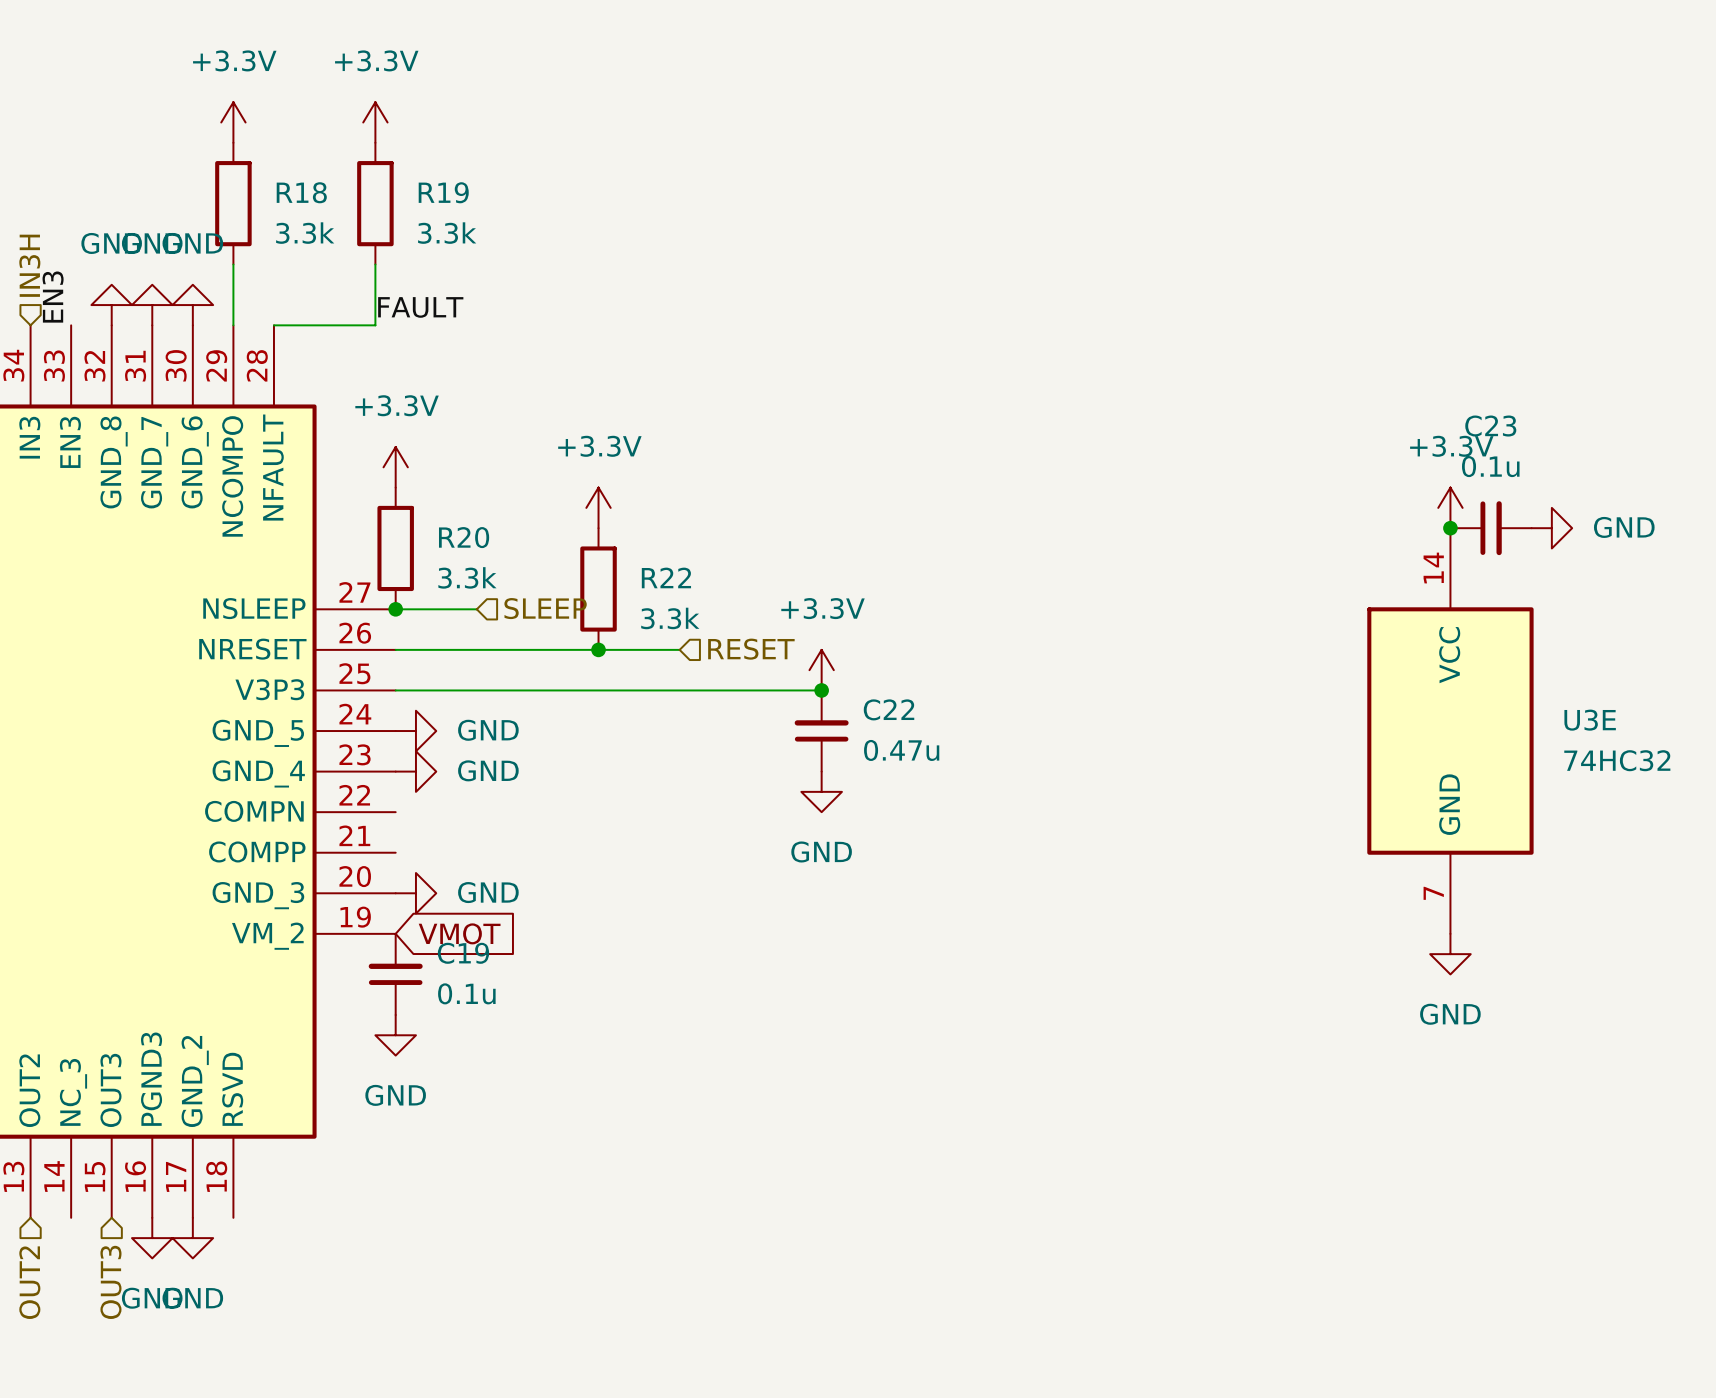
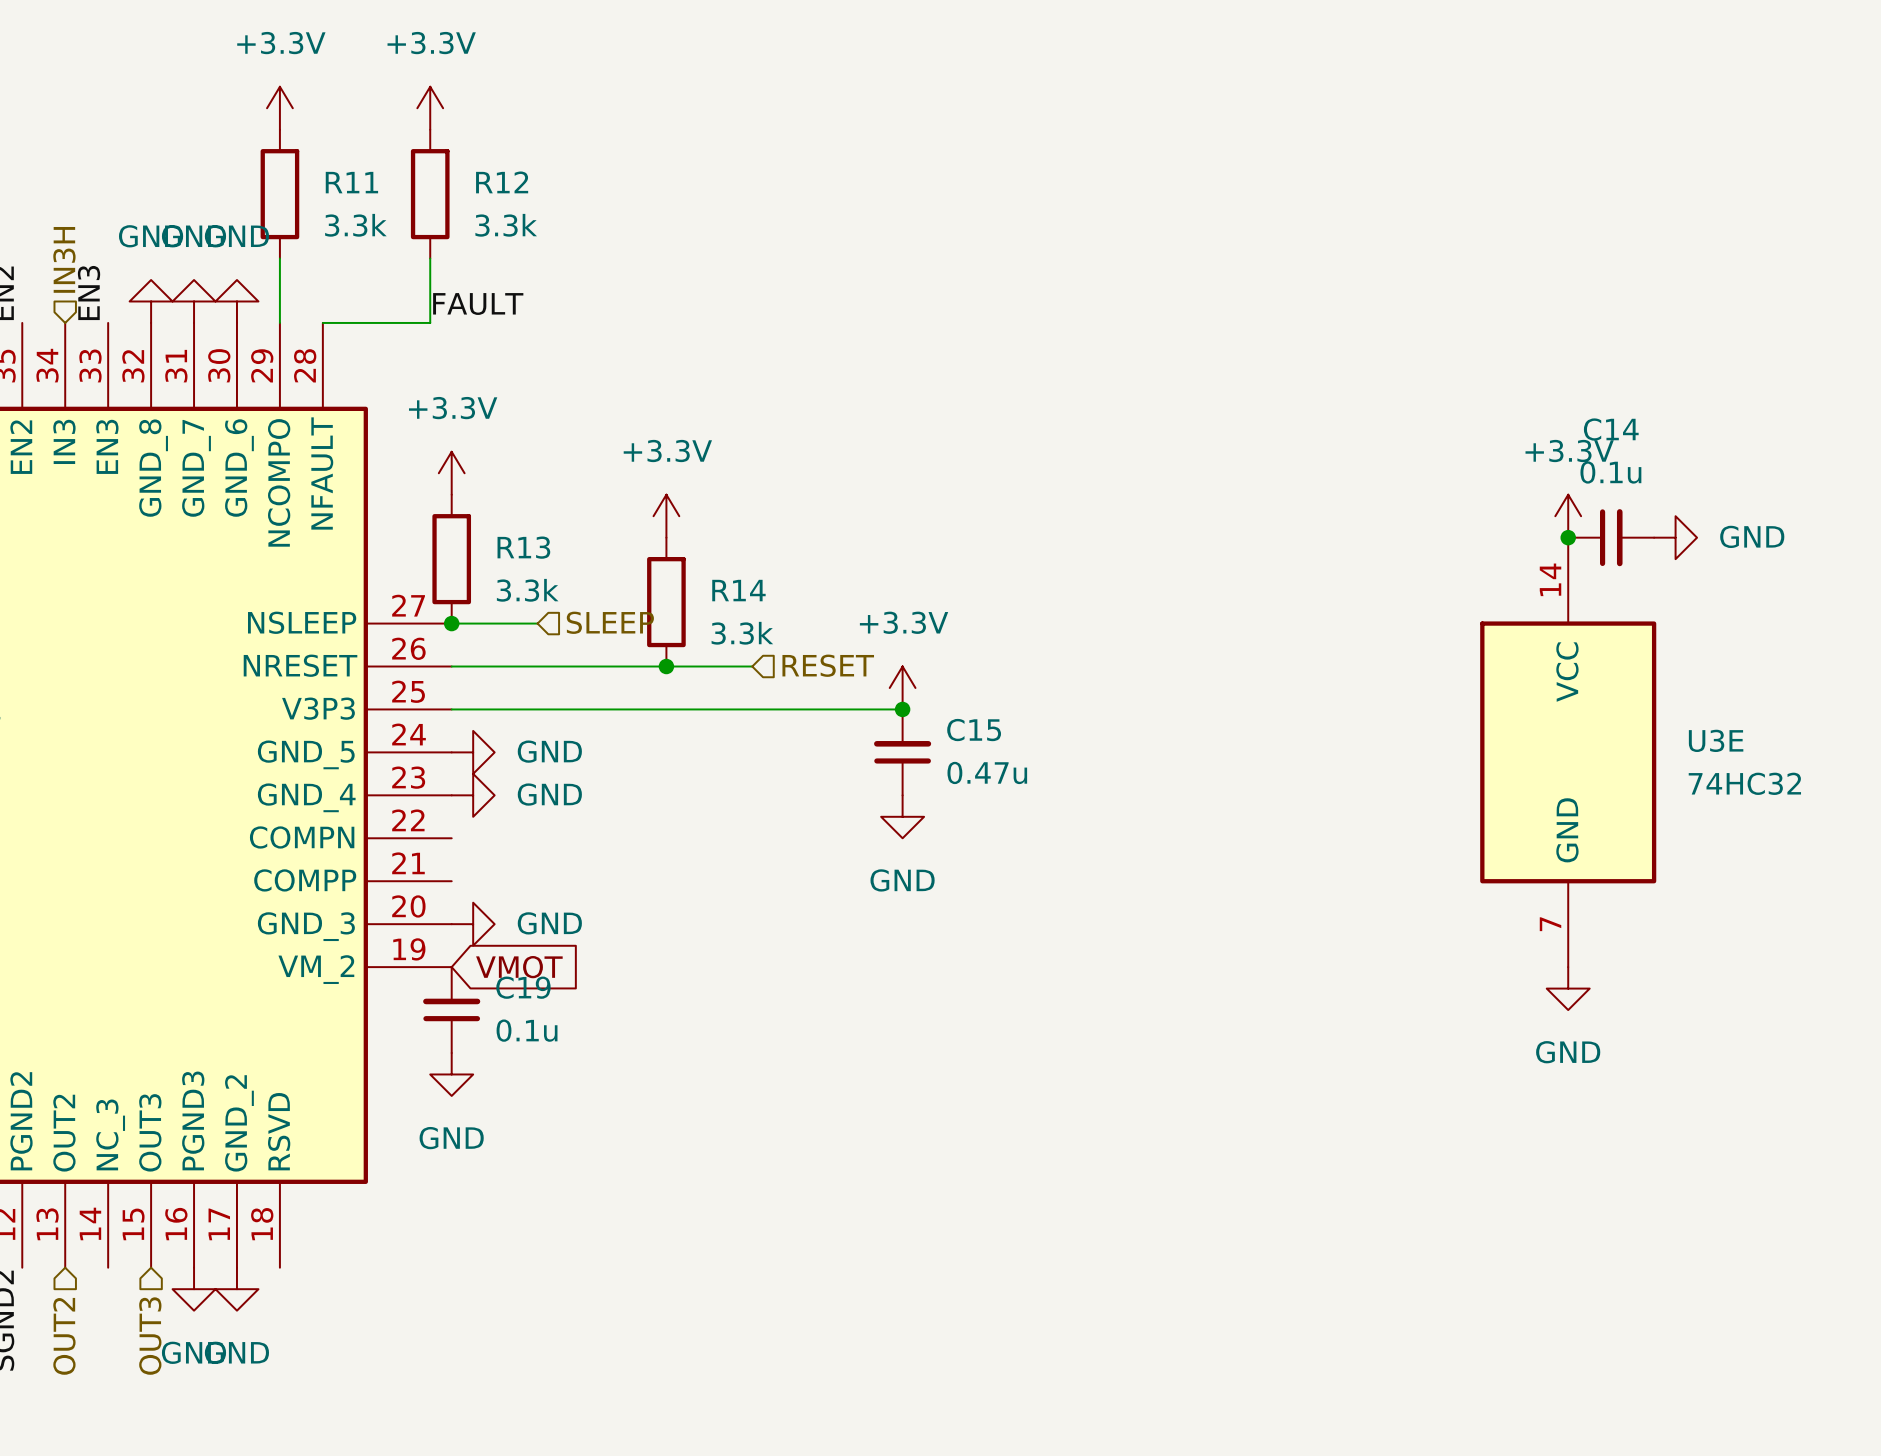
R18 name: R18 (301, 192) -> R11 (351, 182)
R19 name: R19 (443, 192) -> R12 (502, 182)
C23 name: C23 (1490, 426) -> C14 (1611, 429)
R20 name: R20 (464, 537) -> R13 (523, 547)
R22 name: R22 (666, 577) -> R14 (738, 590)
C22 name: C22 (889, 709) -> C15 (974, 730)

